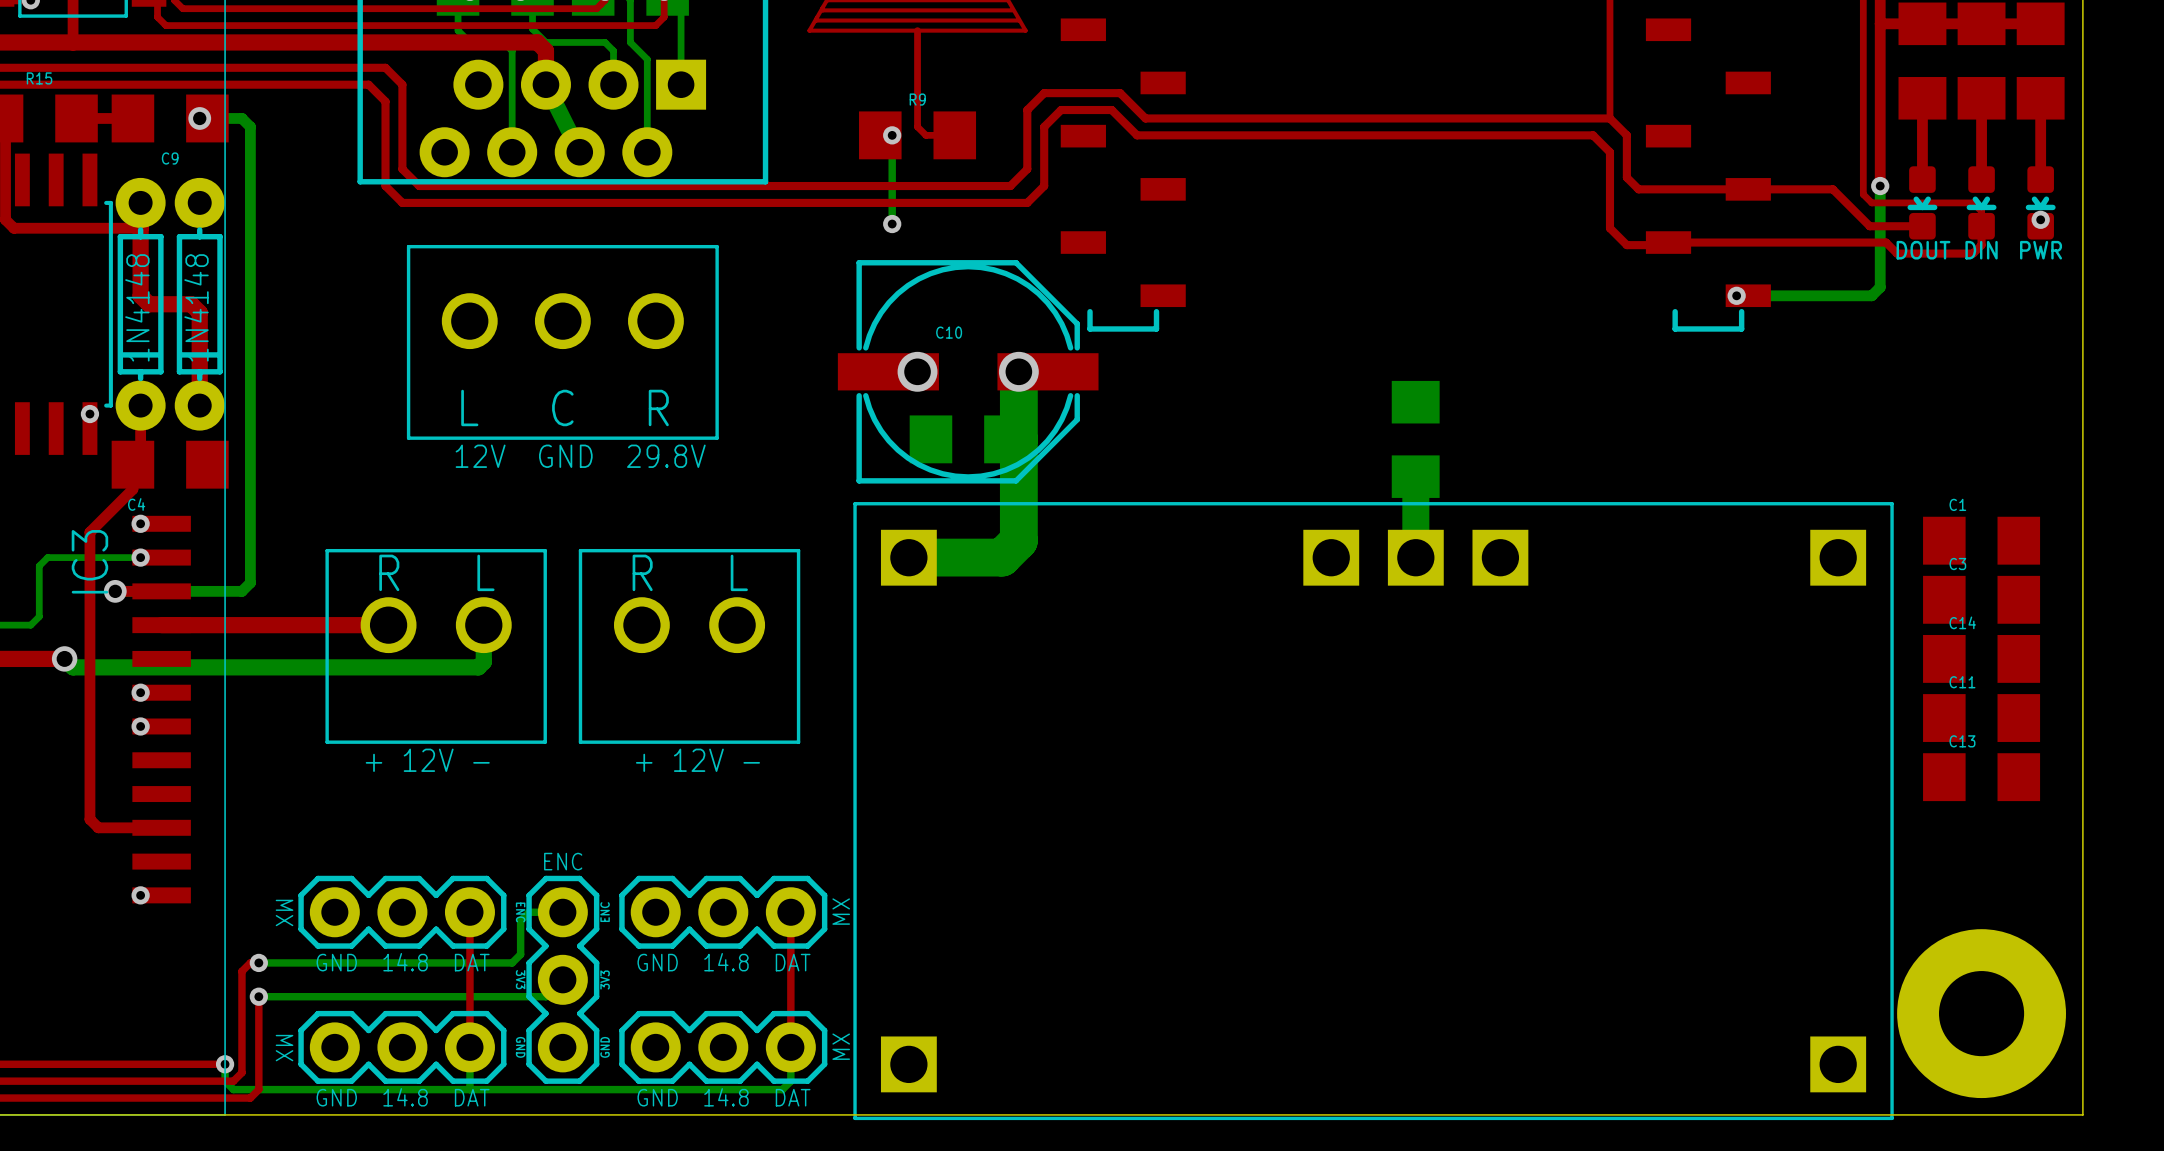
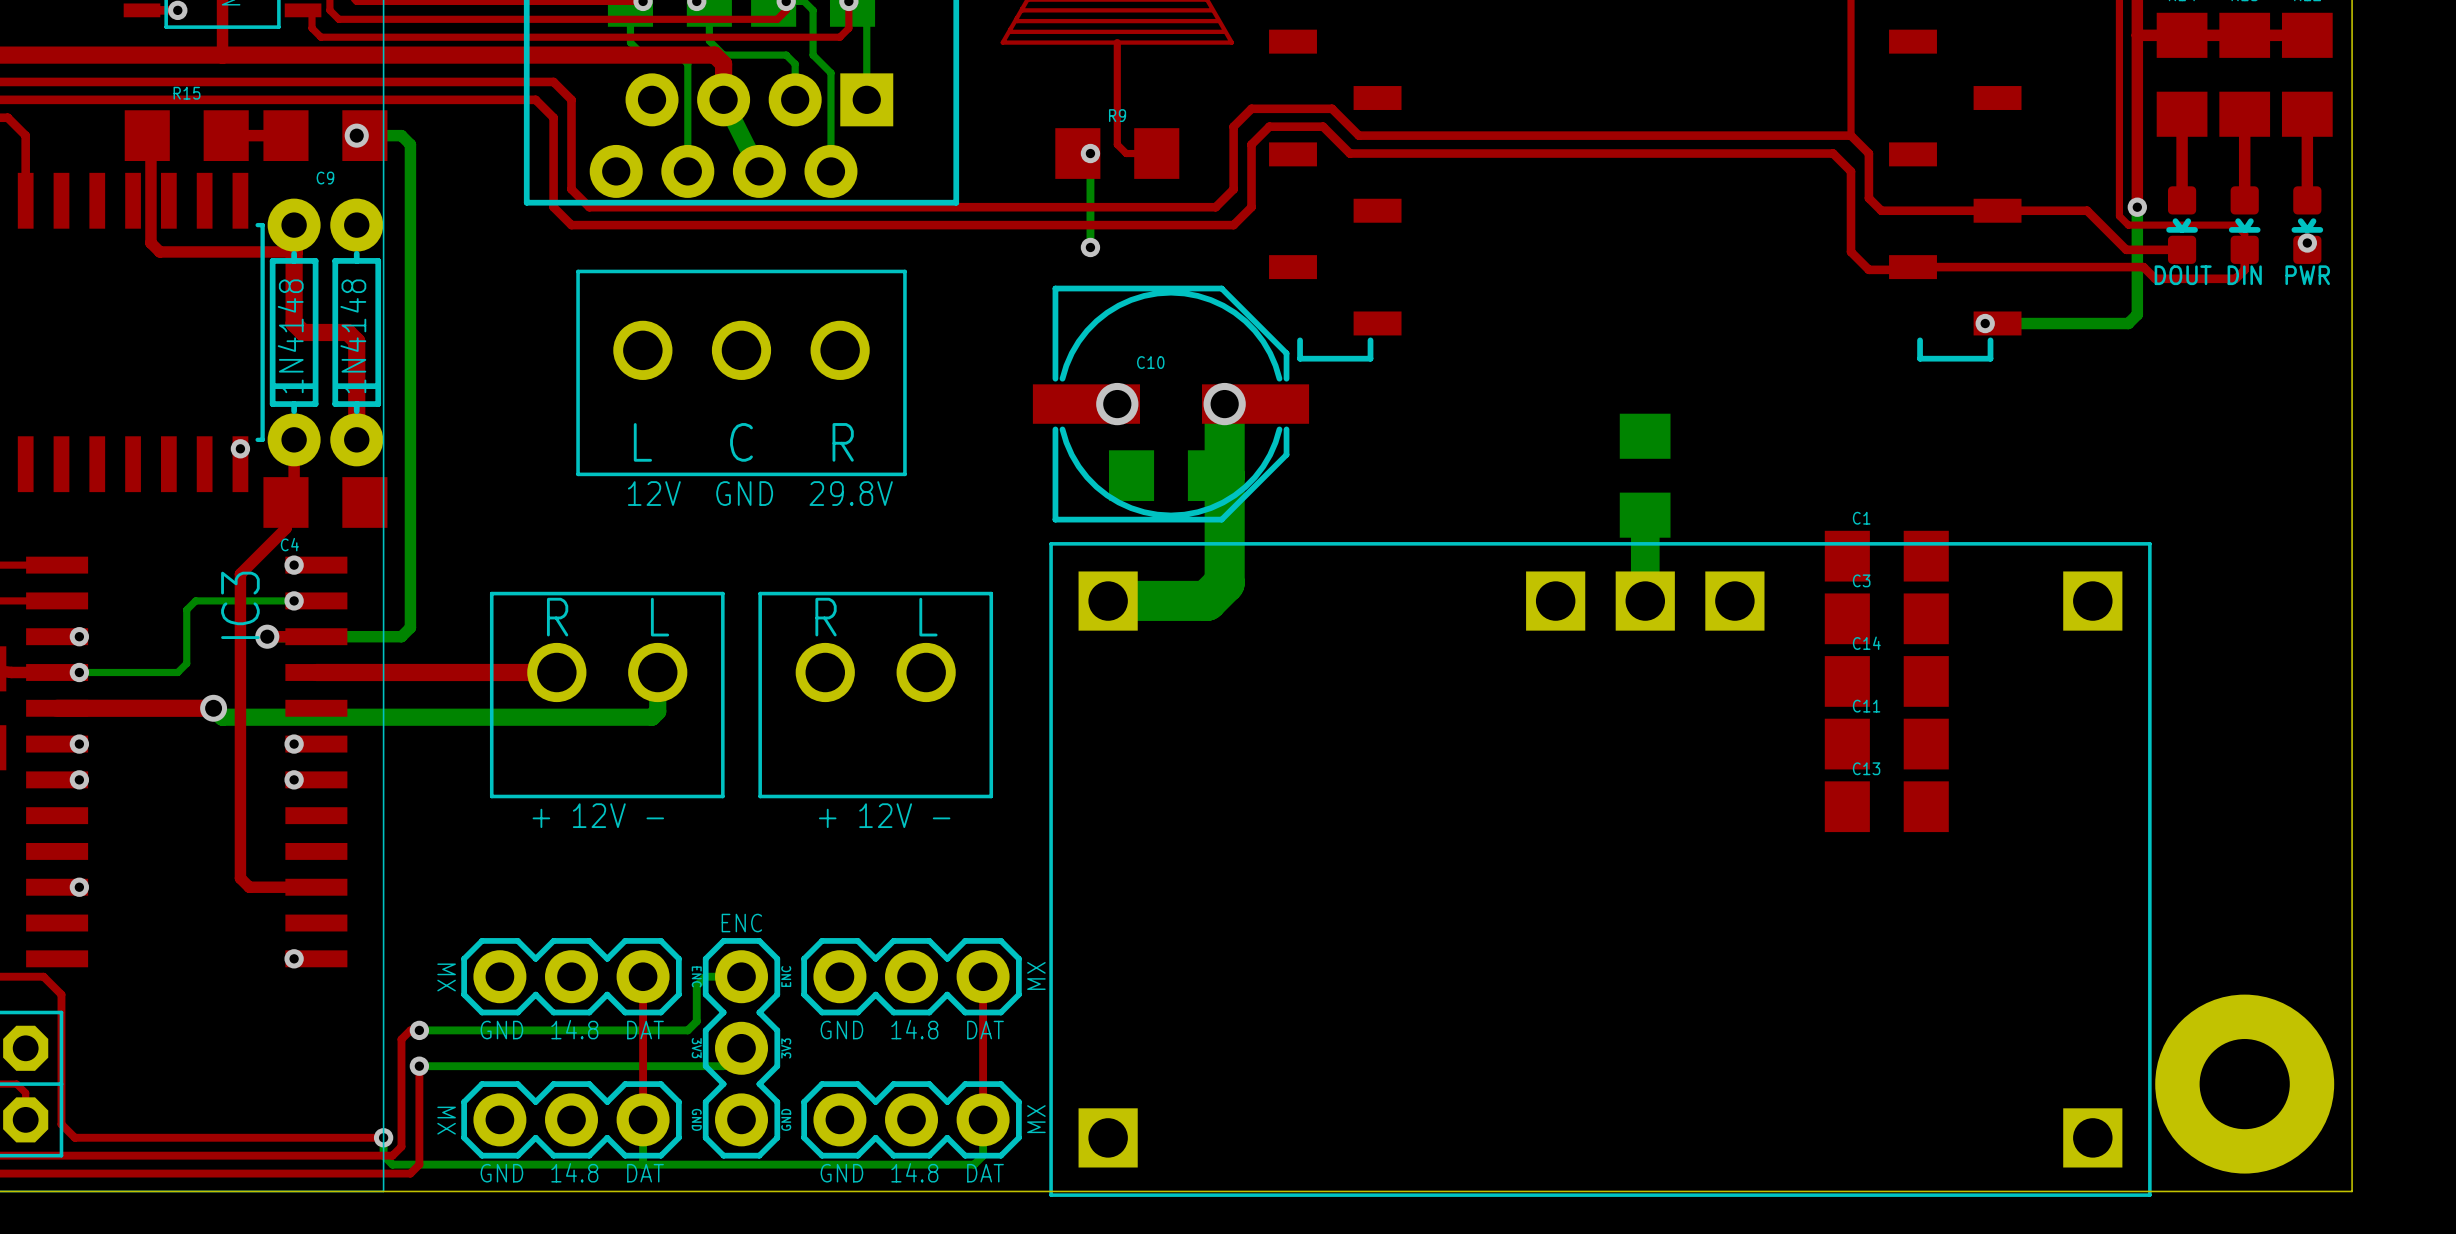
C1 position: (1981, 540) -> (1886, 556)
C3 position: (1981, 599) -> (1886, 618)
C14 position: (1981, 658) -> (1886, 681)
C11 position: (1981, 718) -> (1886, 744)
C13 position: (1981, 777) -> (1886, 806)

